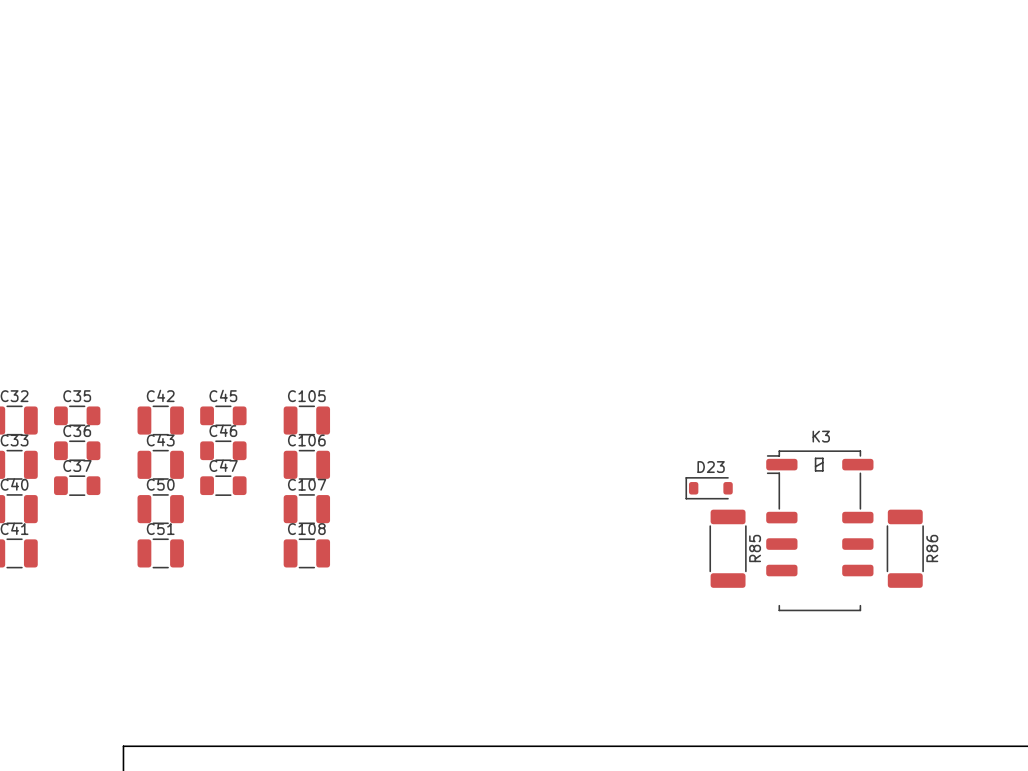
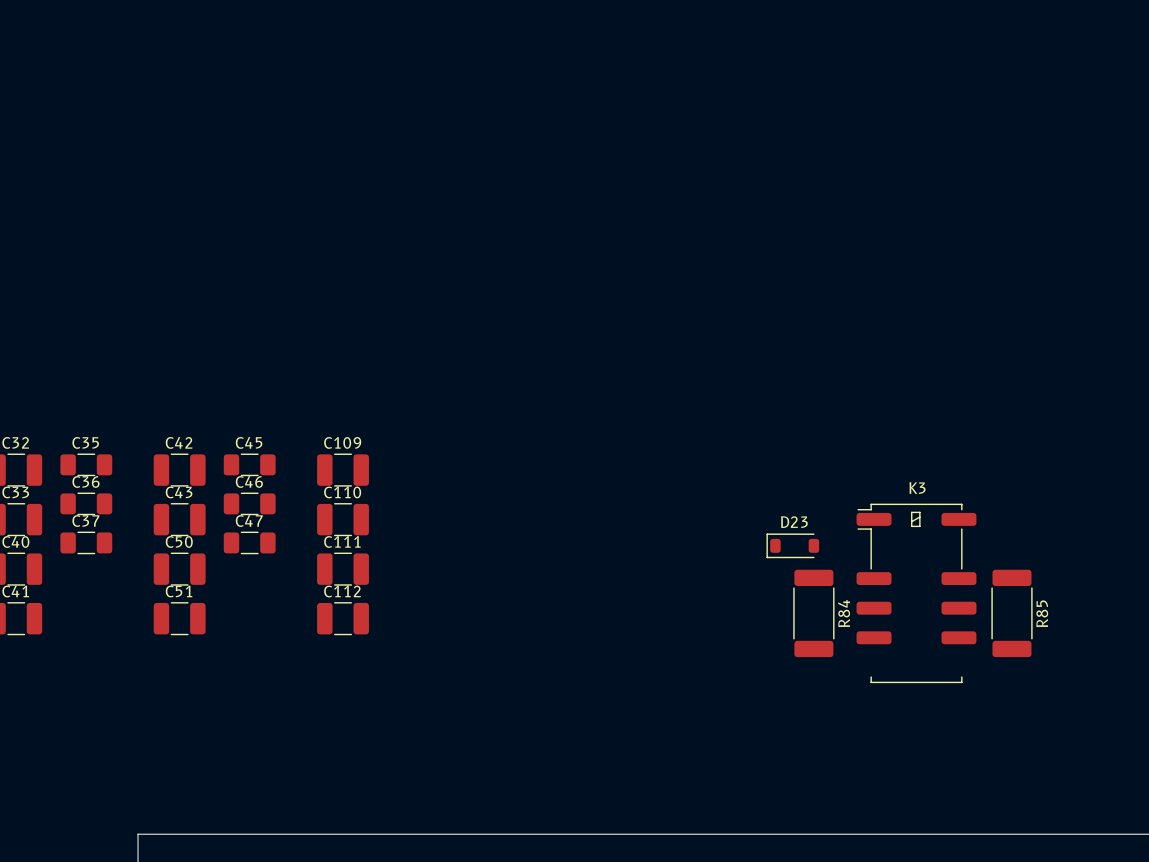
C105 name: C105 (306, 396) -> C109 (342, 442)
C106 name: C106 (306, 440) -> C110 (342, 492)
C107 name: C107 (307, 484) -> C111 (342, 541)
C108 name: C108 (306, 529) -> C112 (342, 591)
R85 name: R85 (755, 548) -> R84 (844, 613)
R86 name: R86 (932, 548) -> R85 (1042, 613)

